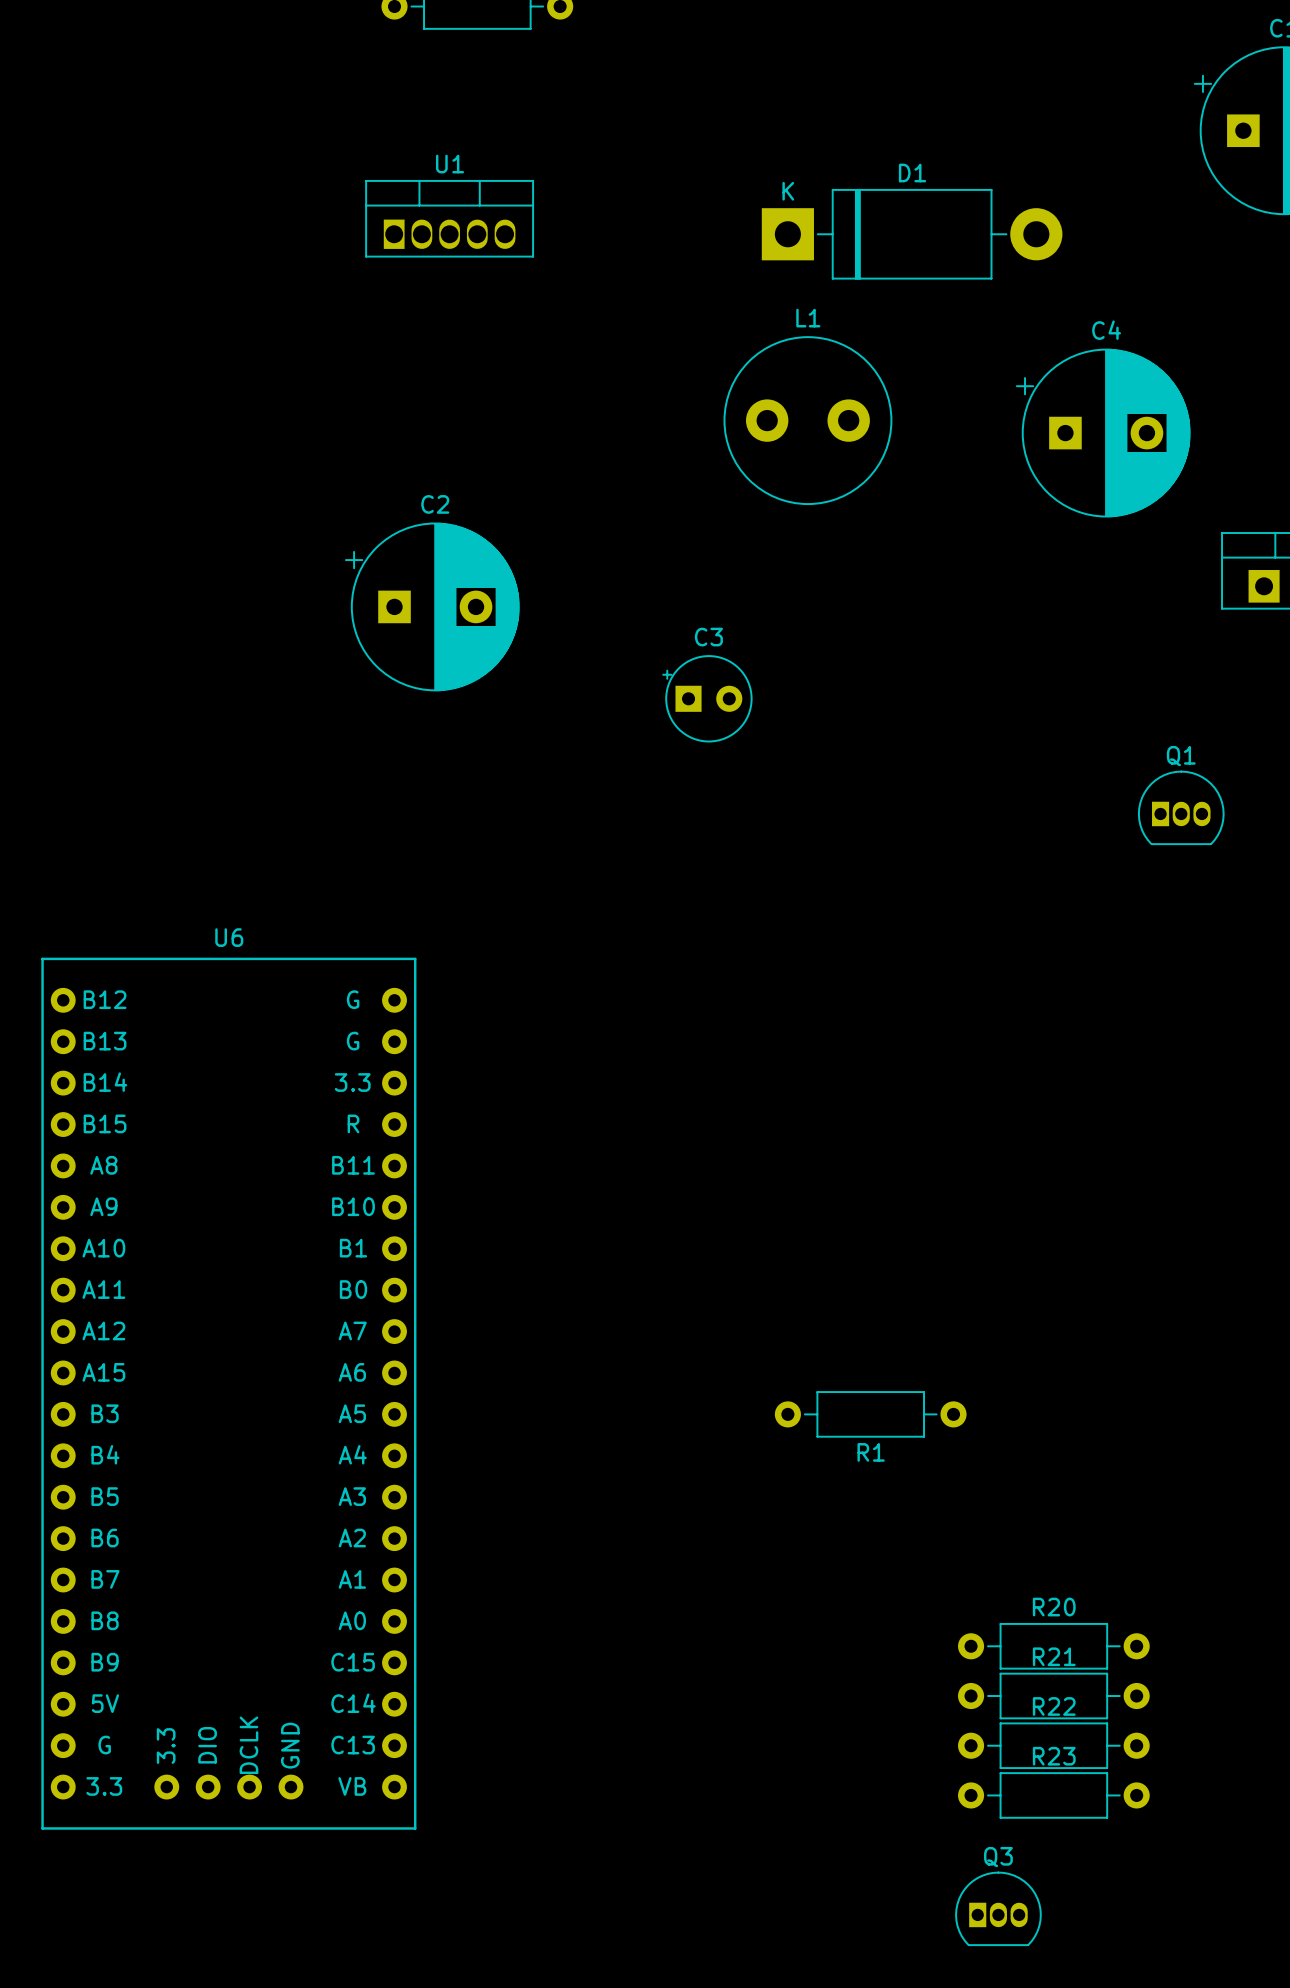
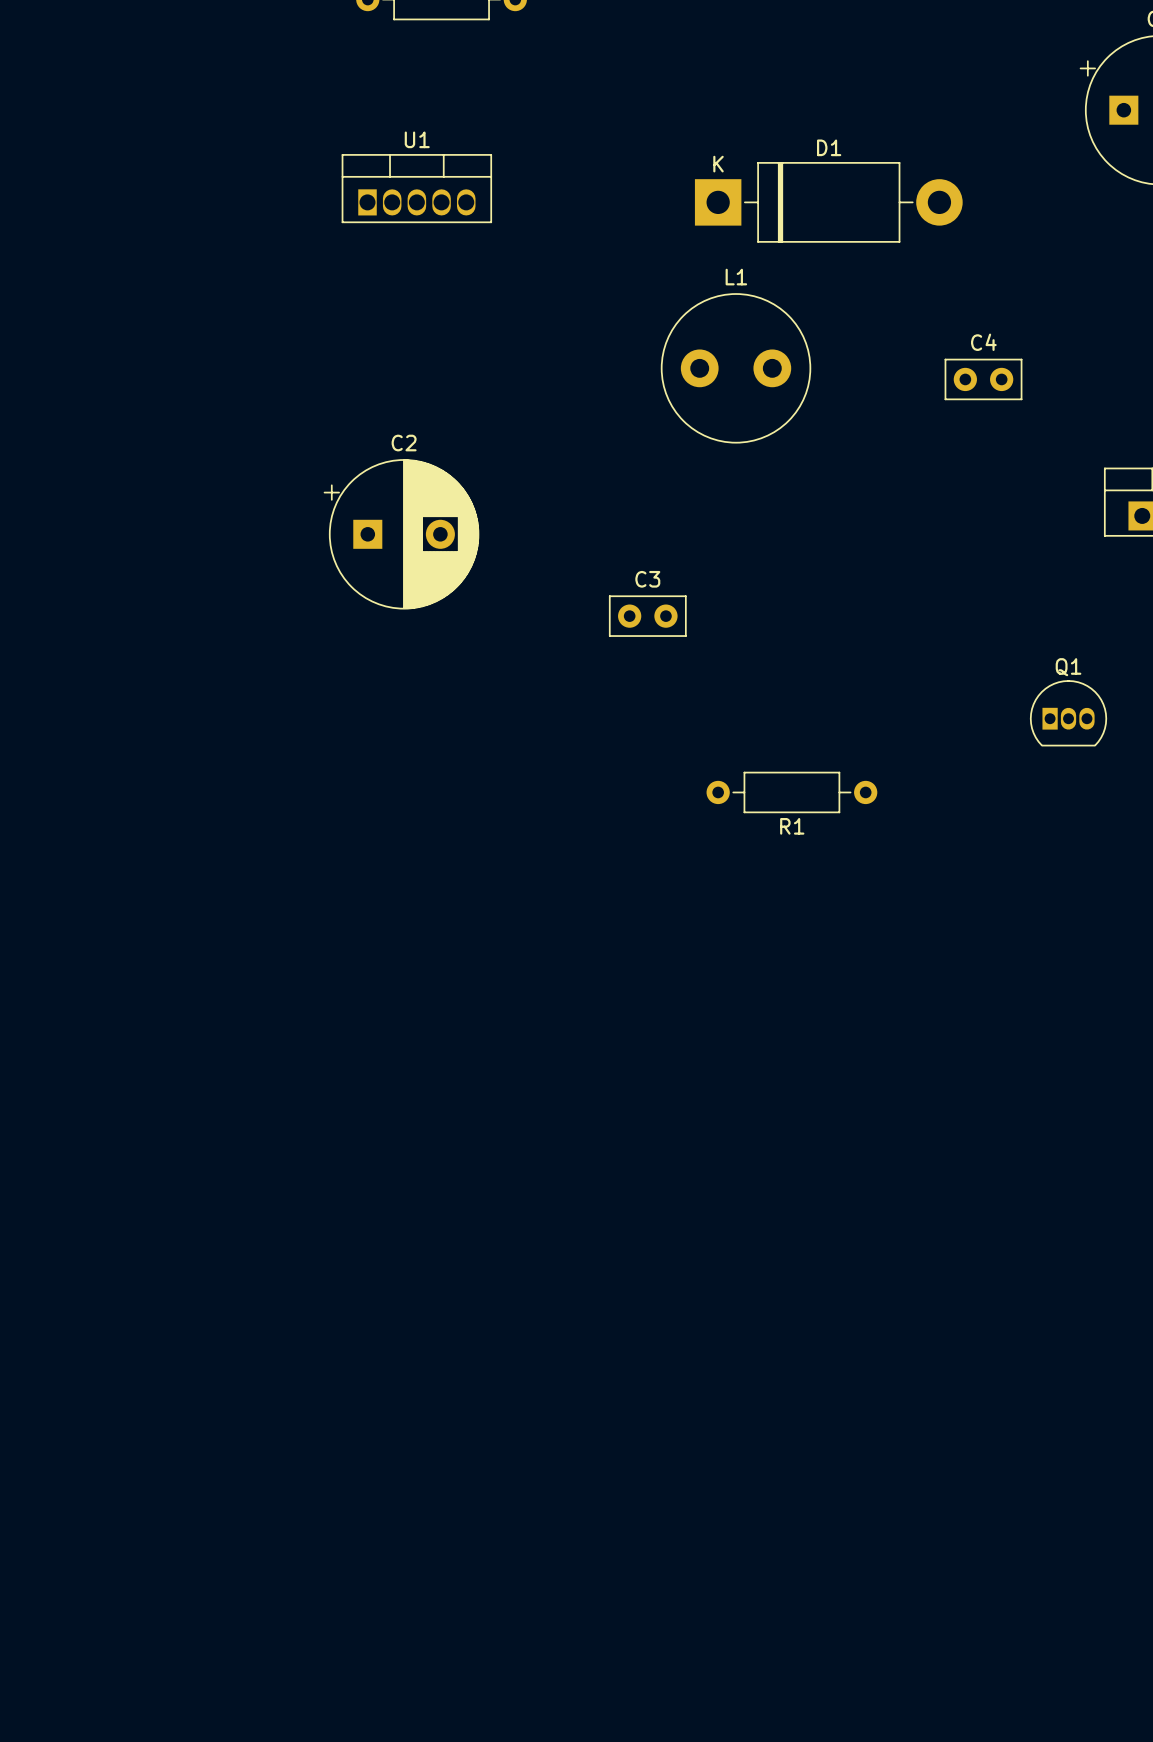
C4 name position: C4 (1106, 330) -> C4 (983, 342)
C4 footprint: [1015, 348, 1191, 518] -> [944, 358, 1023, 401]
C3 footprint: [662, 655, 753, 743] -> [608, 595, 687, 637]
U6: (228, 1393) -> none
R1 position: (870, 1414) -> (791, 792)
R20: (1053, 1646) -> none
R21: (1053, 1696) -> none
R22: (1053, 1745) -> none
R23: (1053, 1795) -> none
Q3: (998, 1908) -> none

